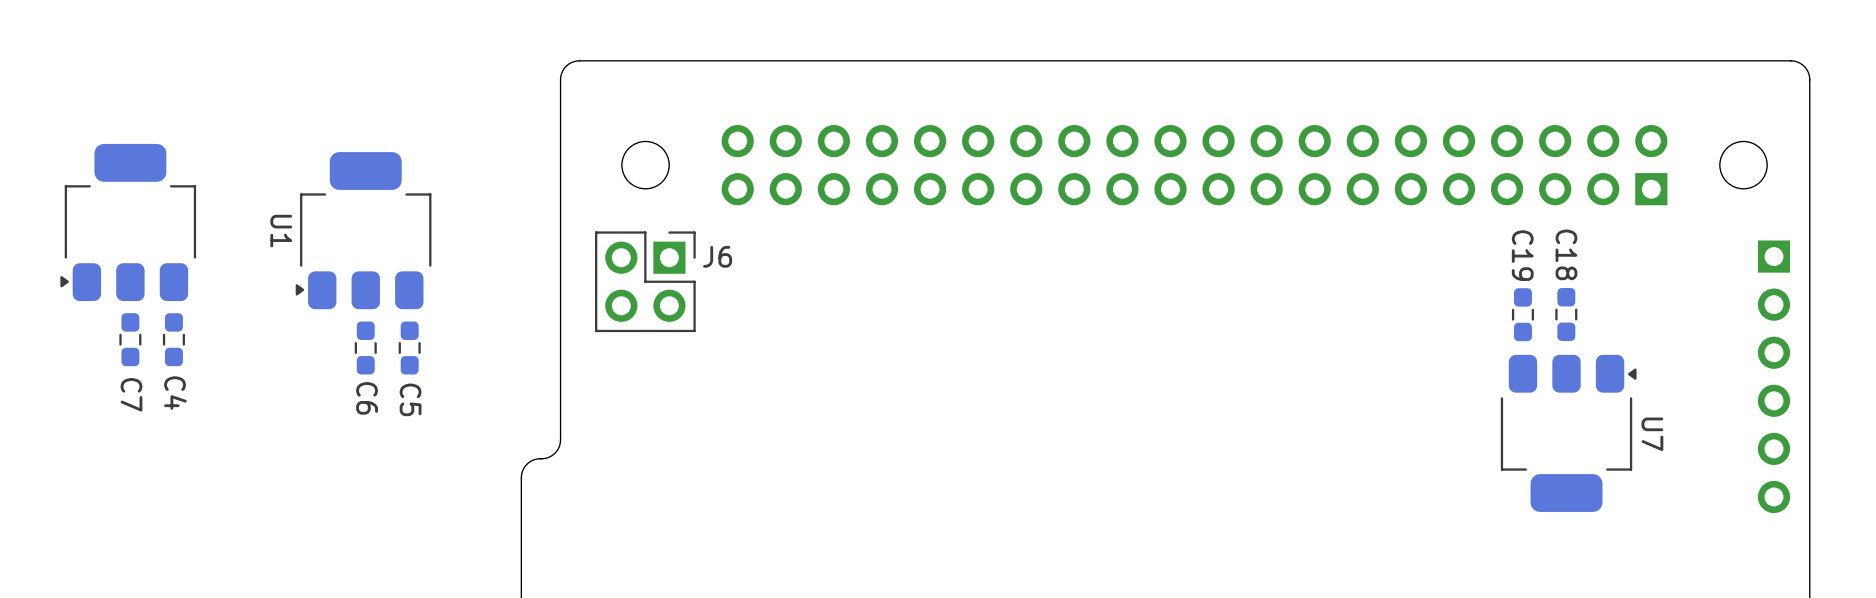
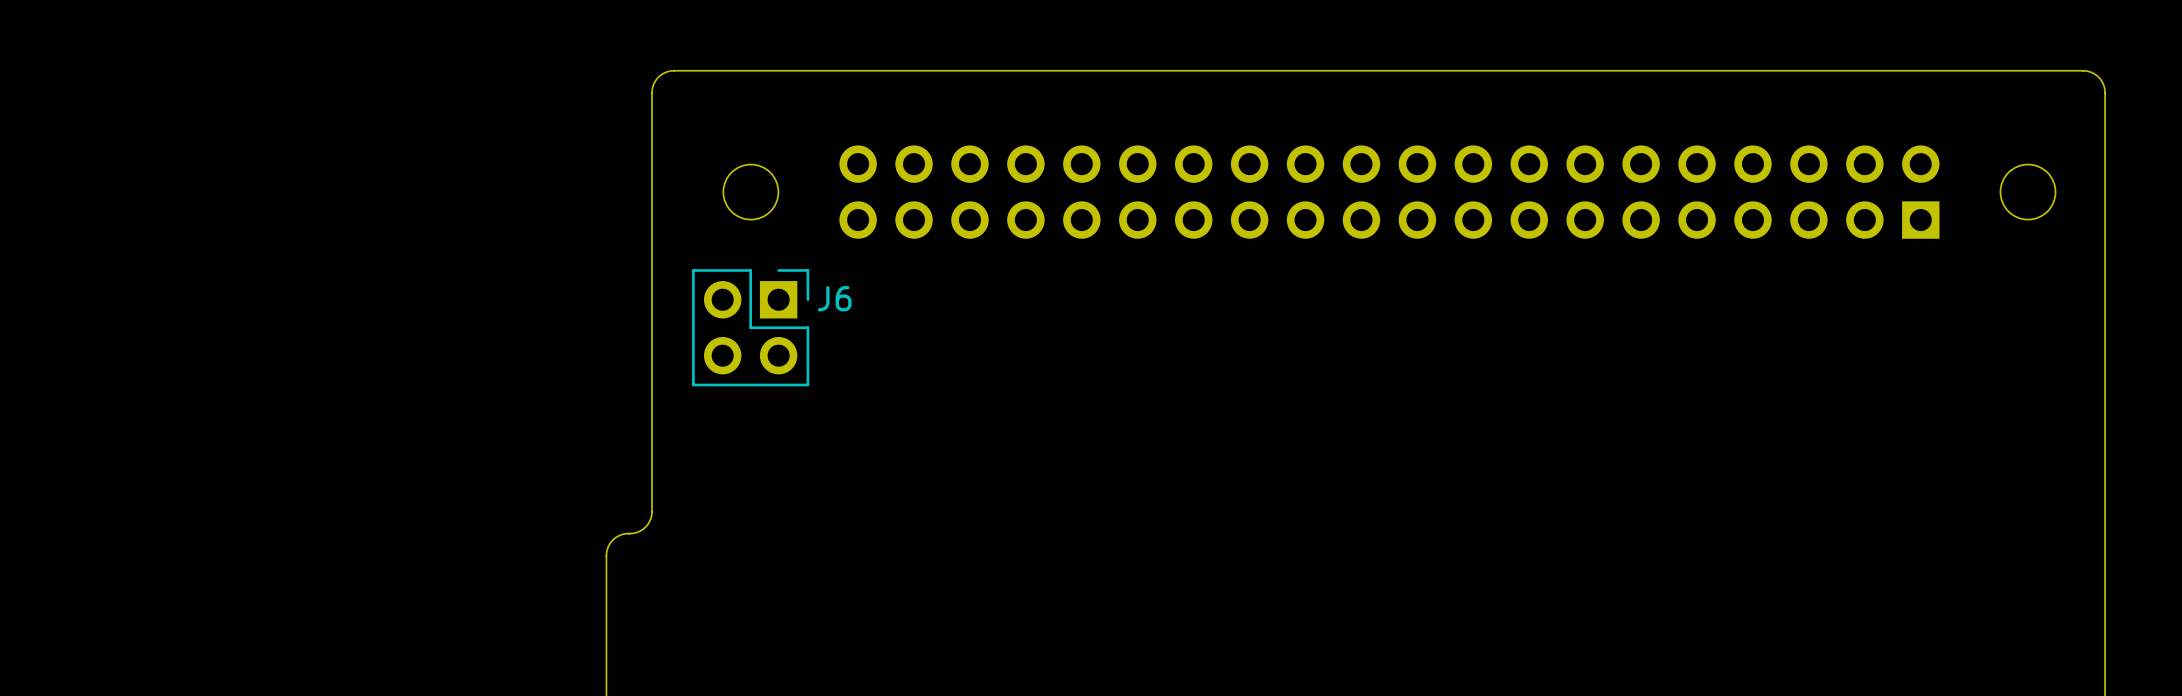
part: (128, 222) -> none
U1: (363, 230) -> none
C19: (1522, 314) -> none
C18: (1566, 314) -> none
C7: (130, 339) -> none
C4: (173, 339) -> none
C6: (365, 348) -> none
C5: (409, 348) -> none
part: (1773, 376) -> none
U7: (1568, 433) -> none

